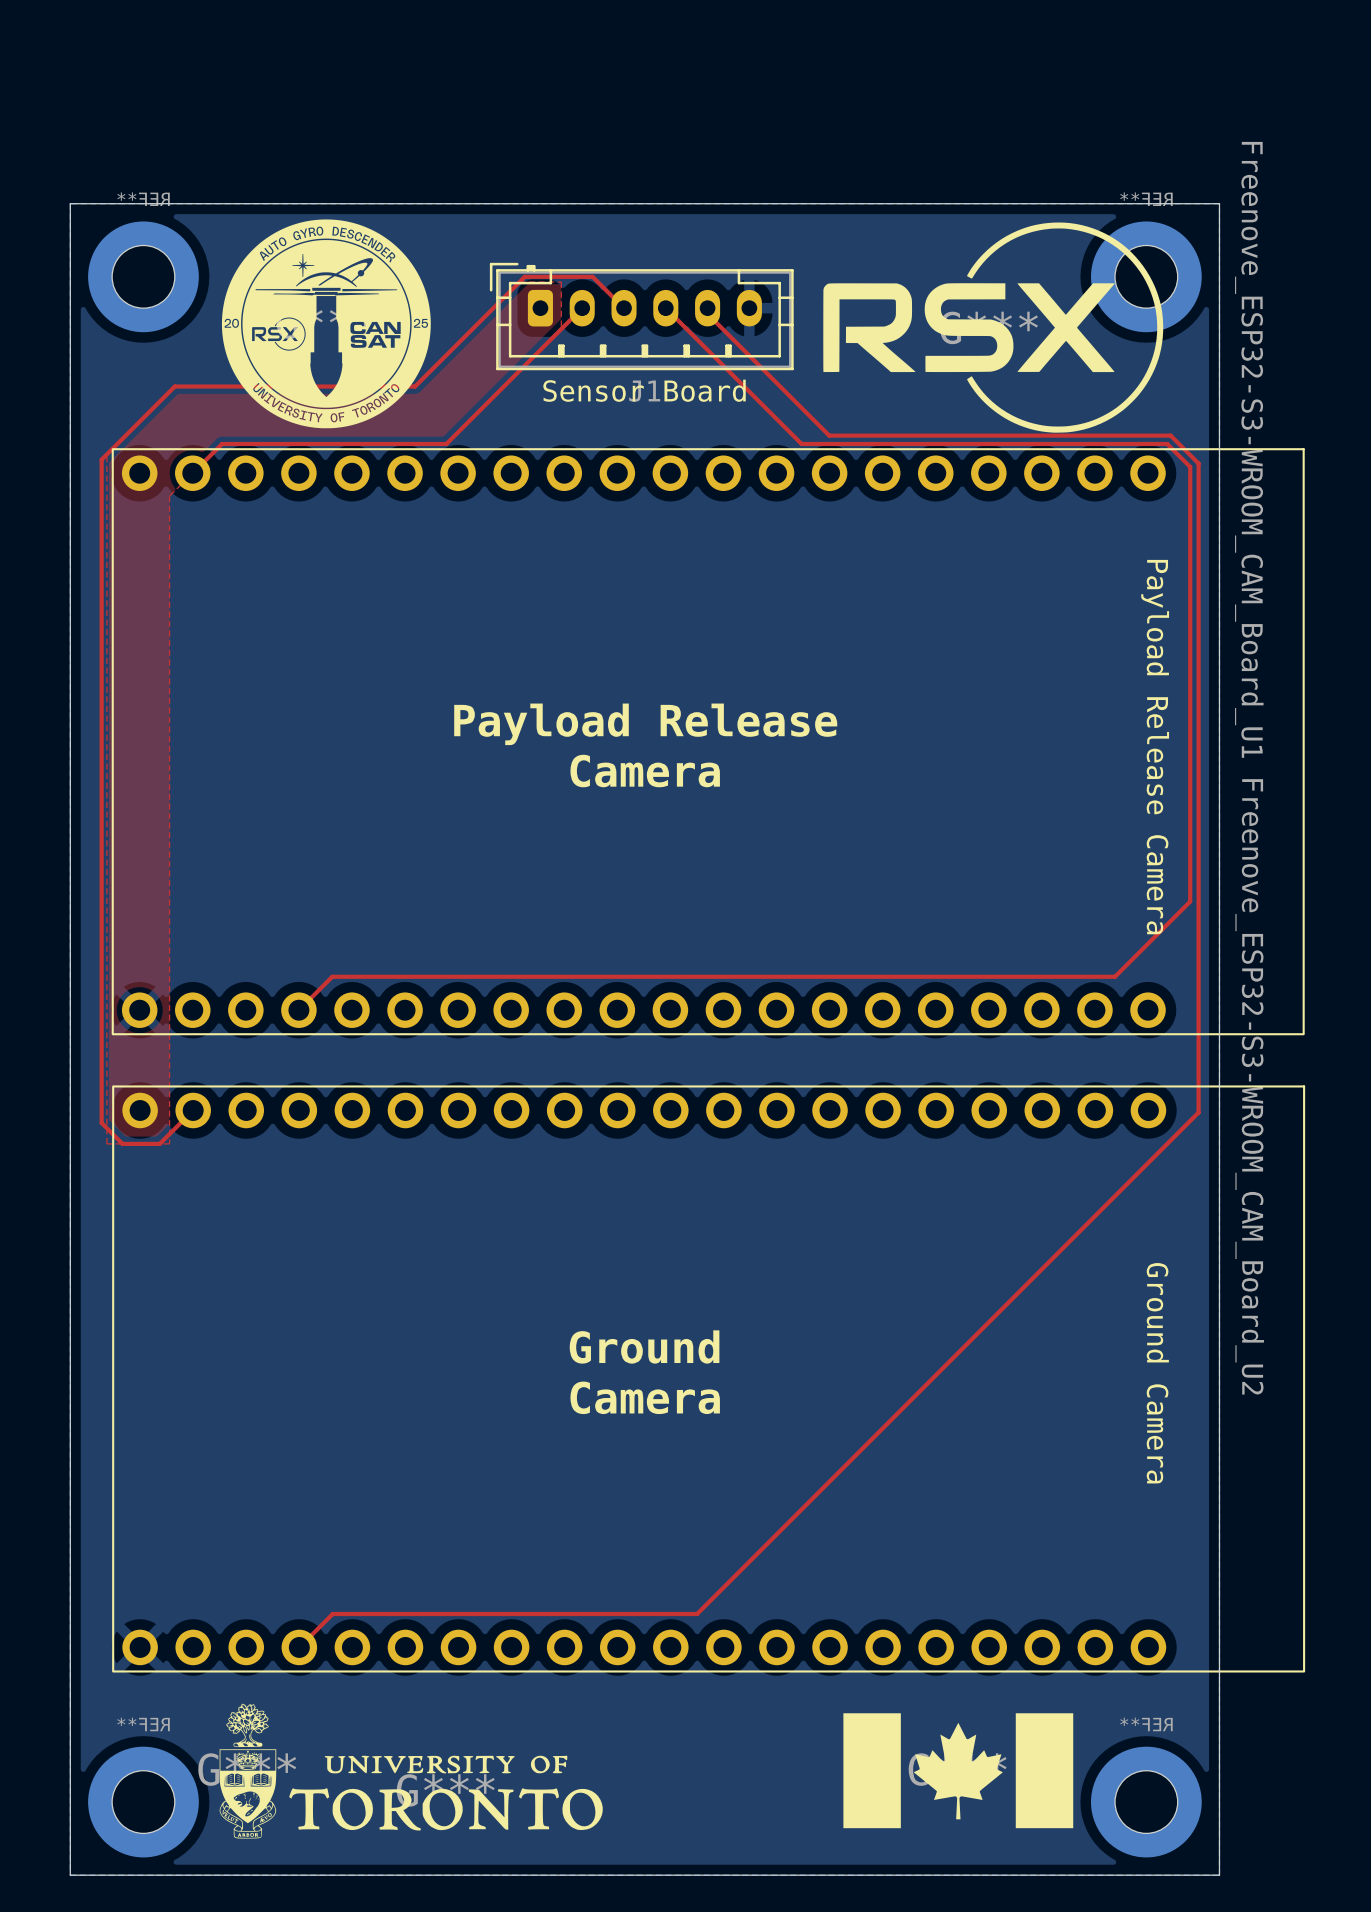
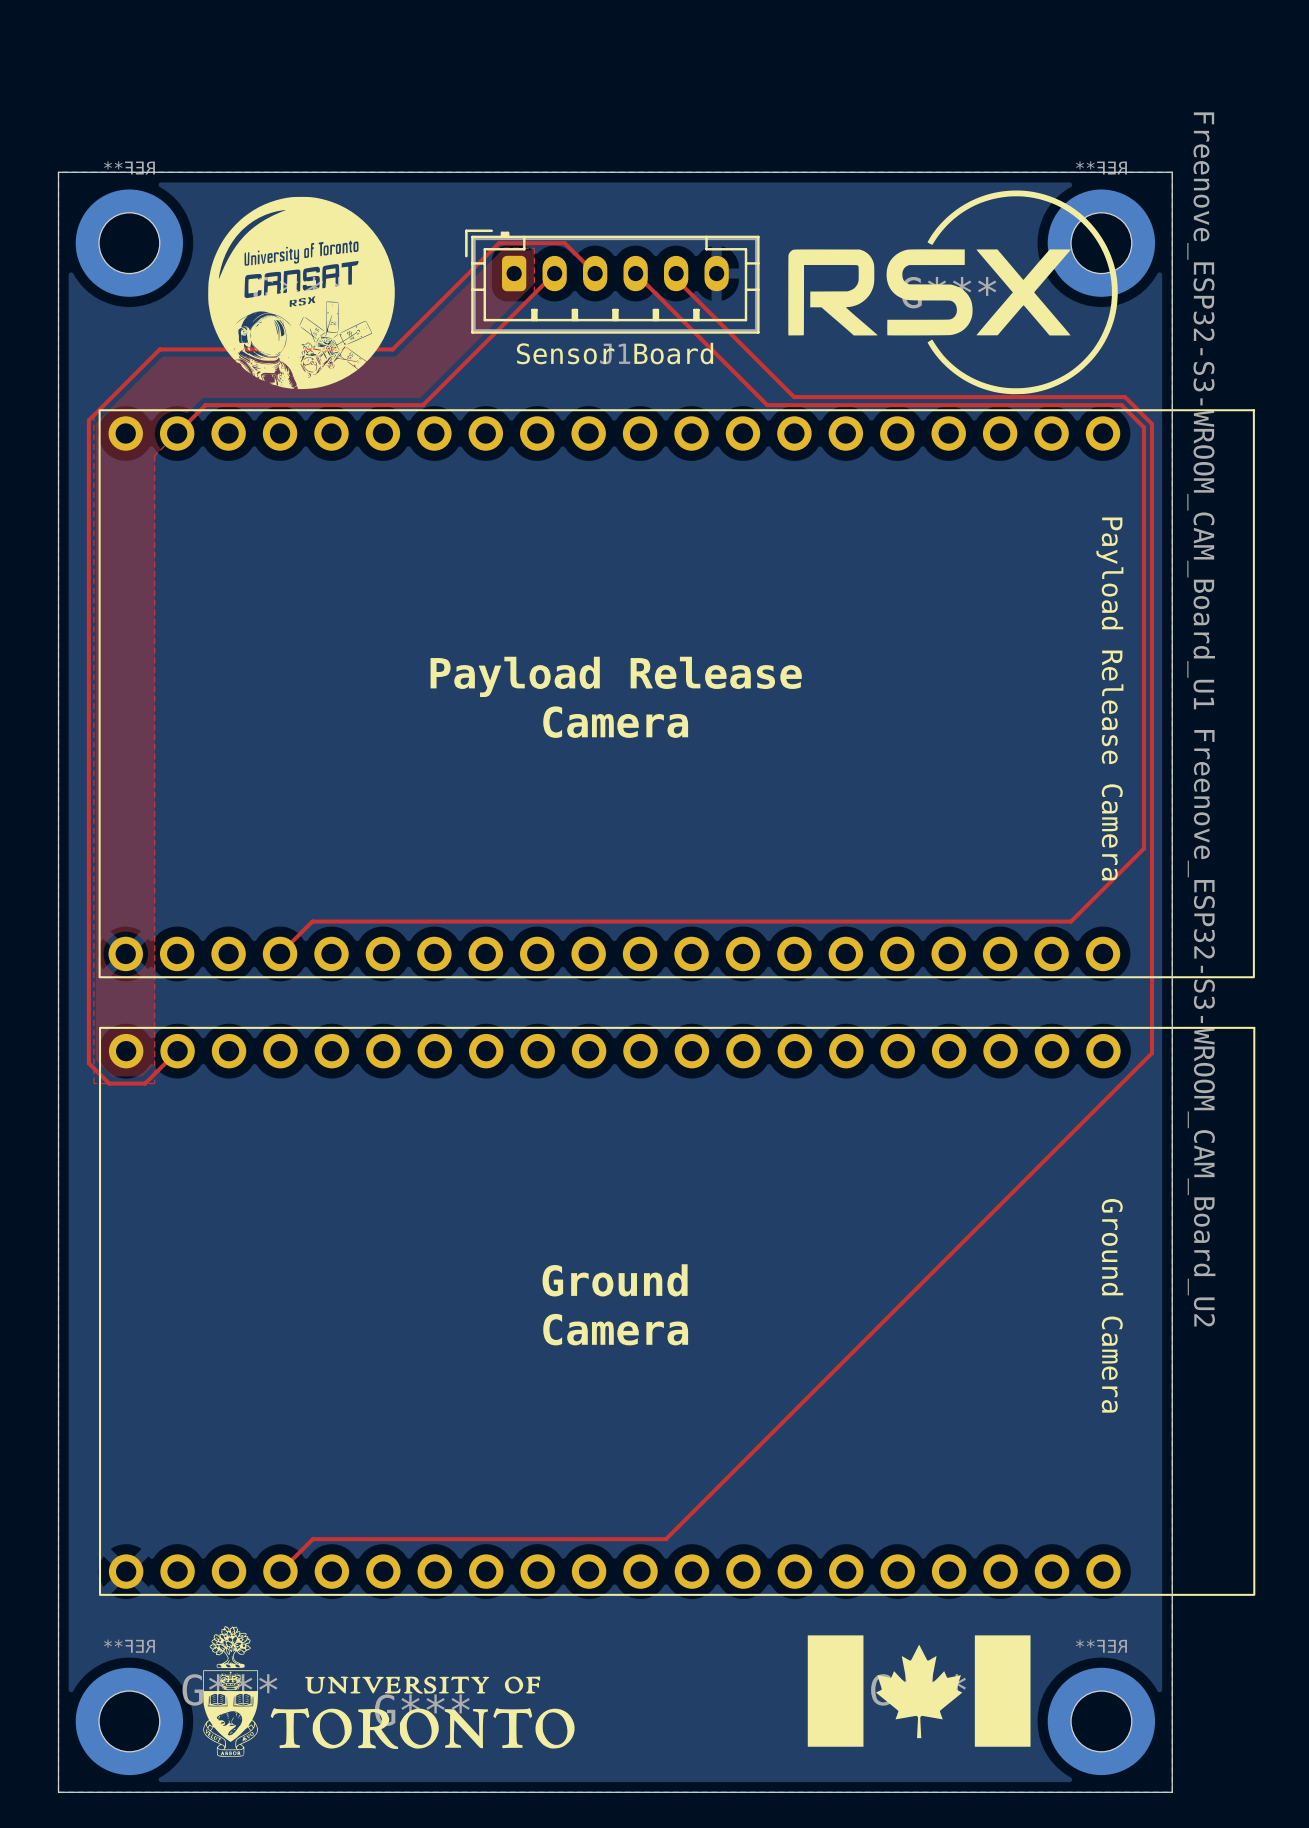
part footprint: [221, 219, 431, 429] -> [208, 196, 395, 390]

